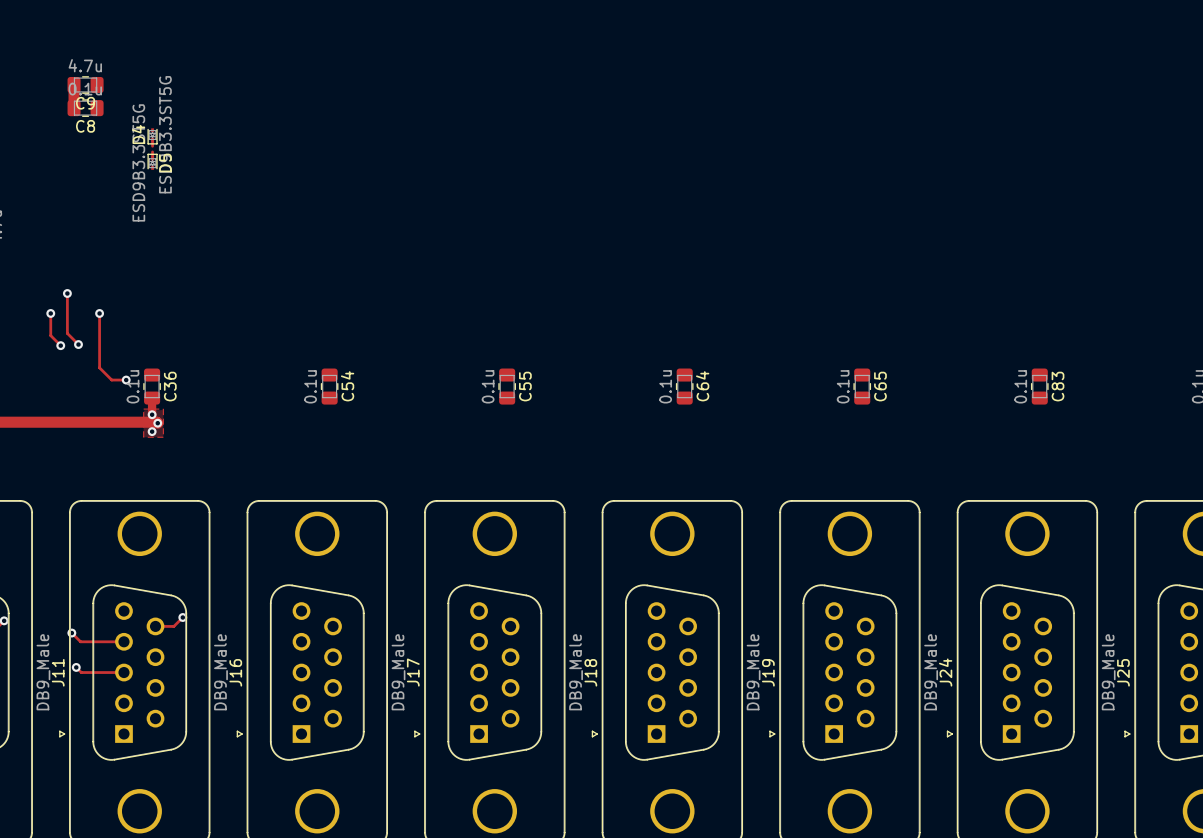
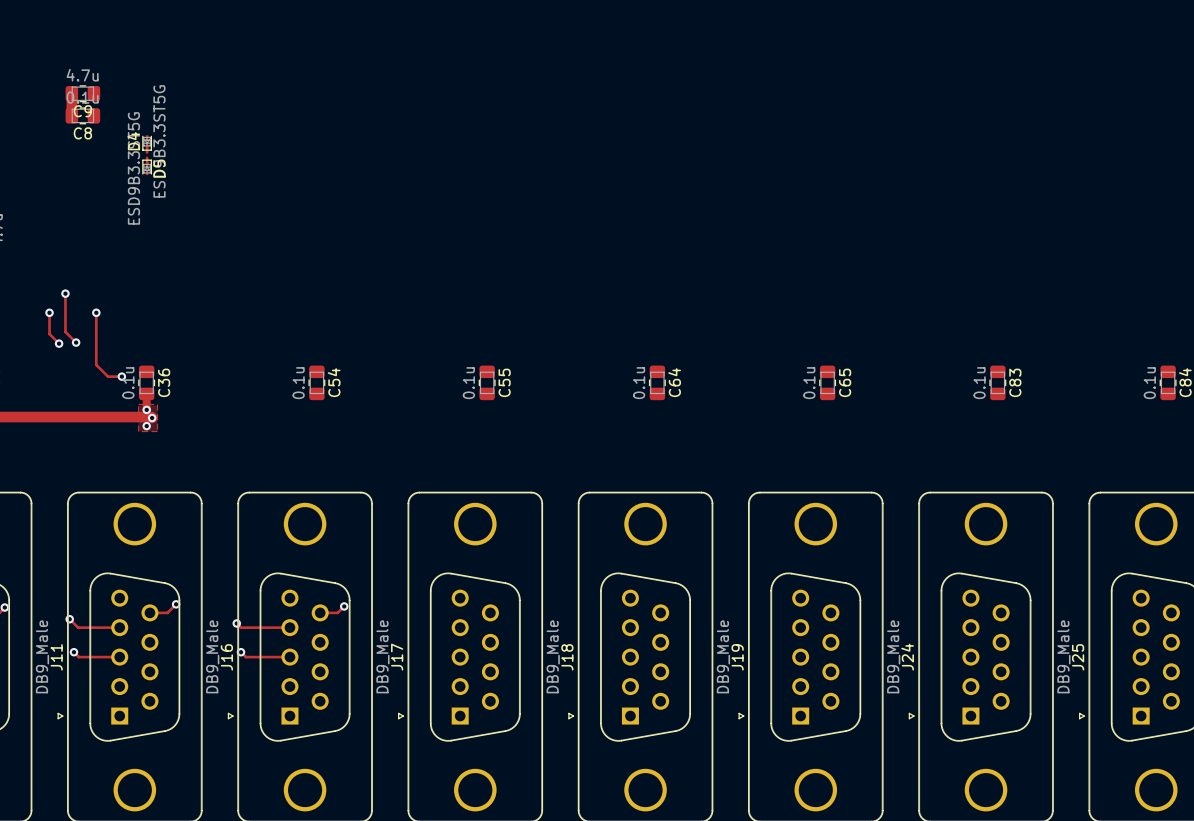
track: none -> (344, 606) (337, 612) (320, 612)
via: none -> (344, 606)
track: none -> (236, 623) (240, 627) (289, 627)
via: none -> (236, 623)
track: none -> (241, 652) (245, 657) (289, 657)
via: none -> (241, 652)

